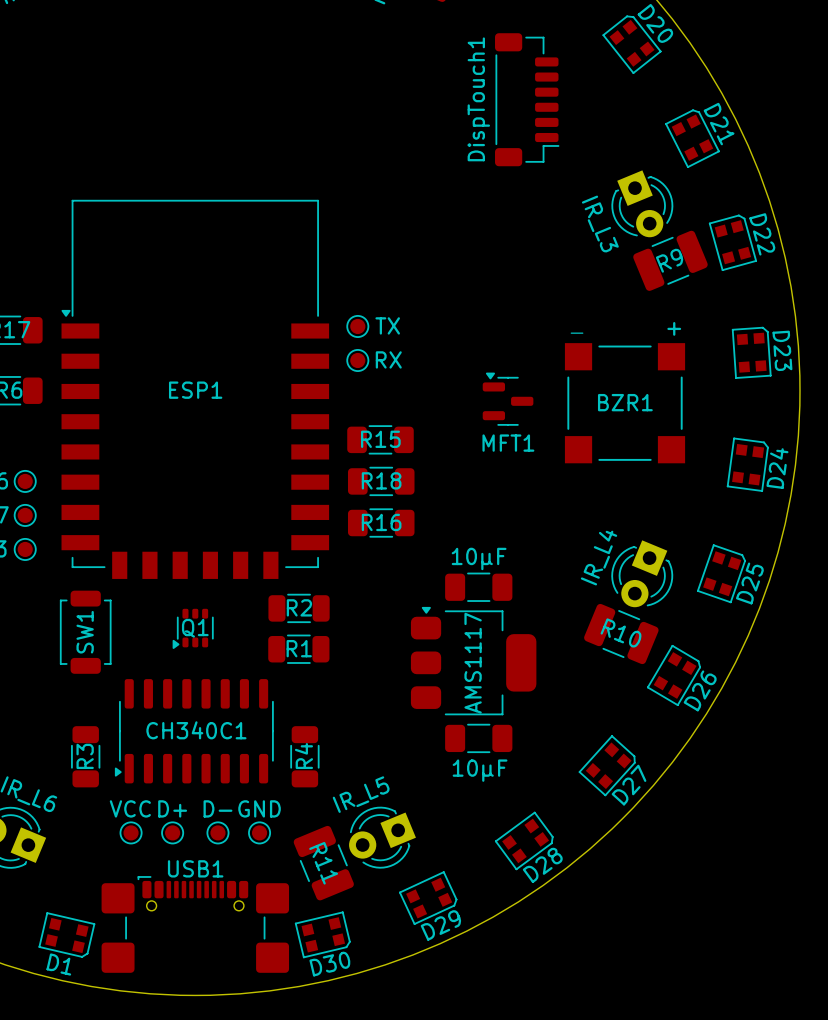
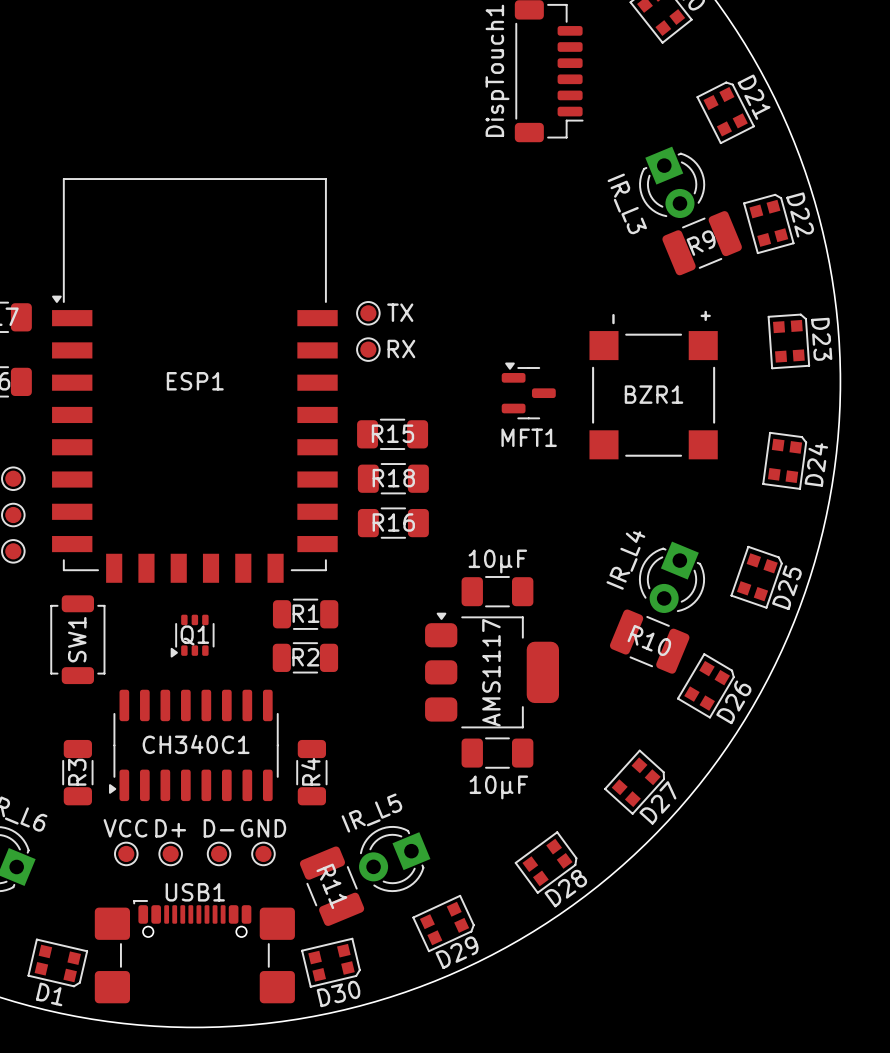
BZR1 footprint: [564, 343, 686, 464] -> [589, 331, 718, 460]
R2 name: R2 (299, 607) -> R1 (306, 613)
R1 name: R1 (299, 648) -> R2 (305, 657)

